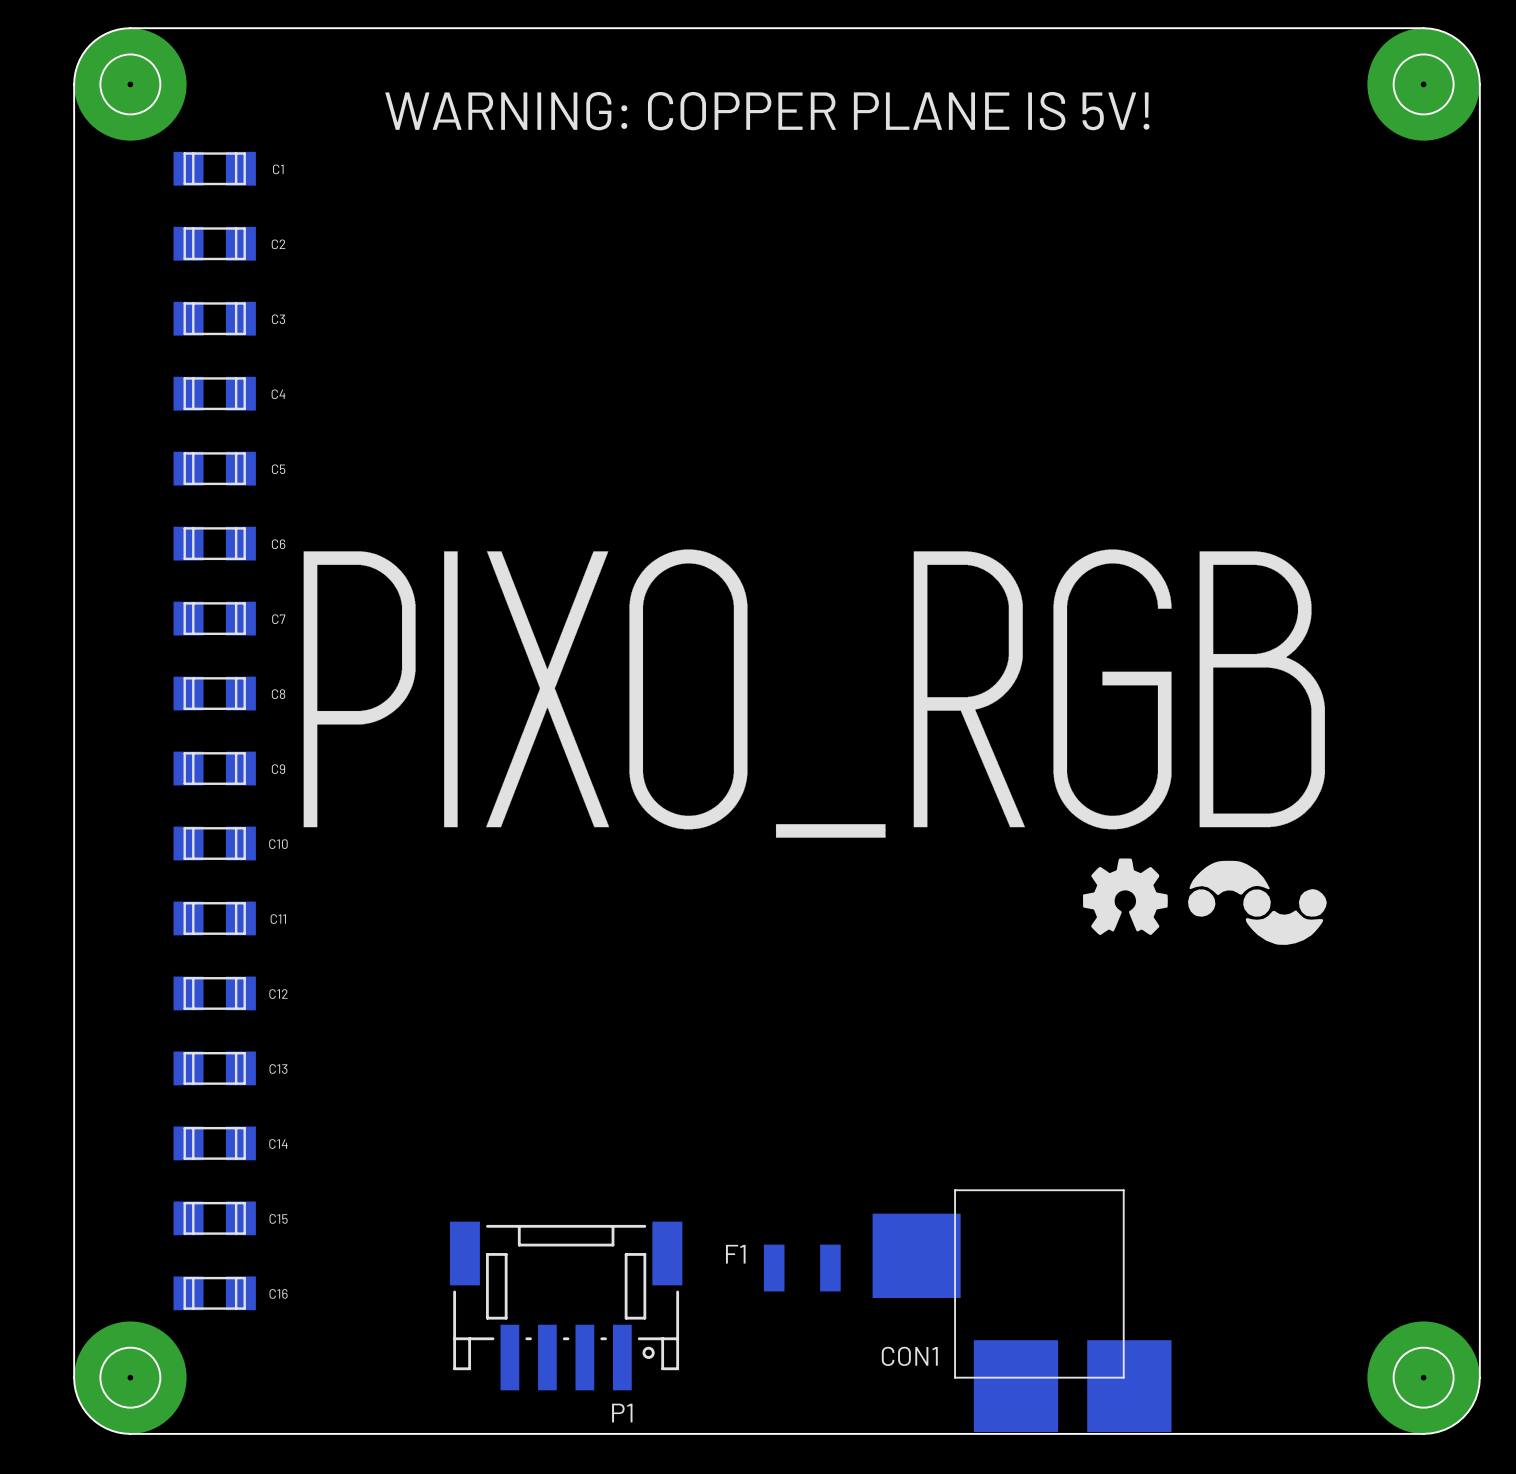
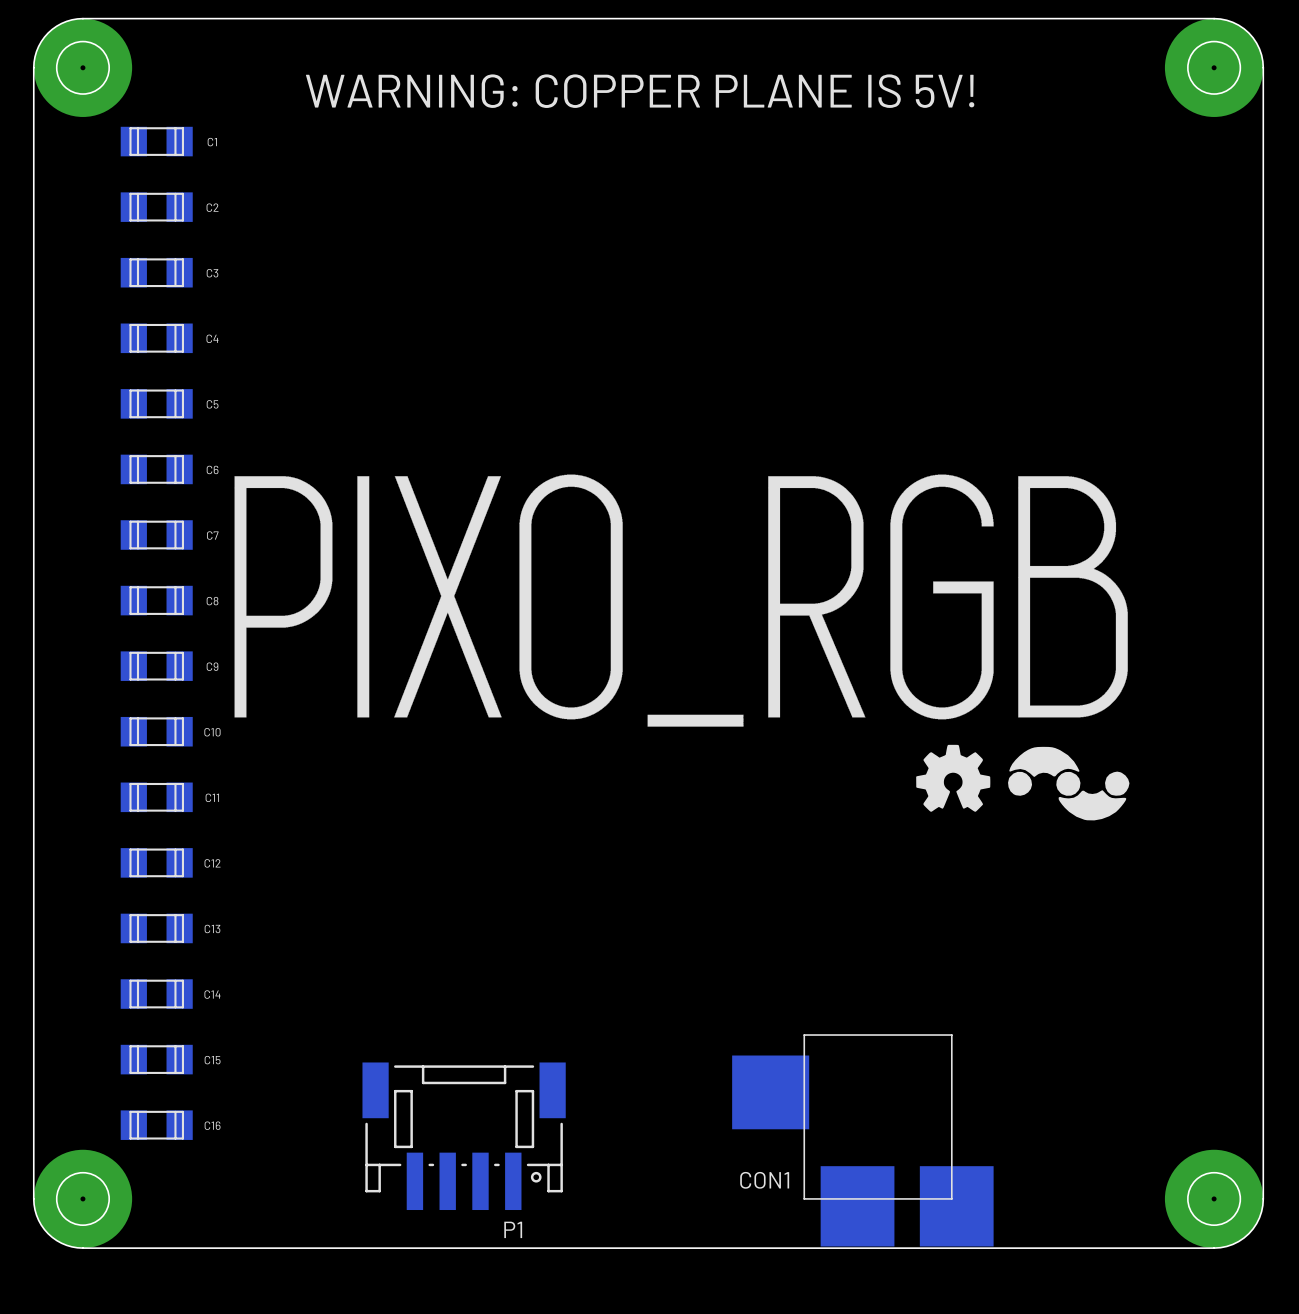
F1: (802, 1268) -> none

